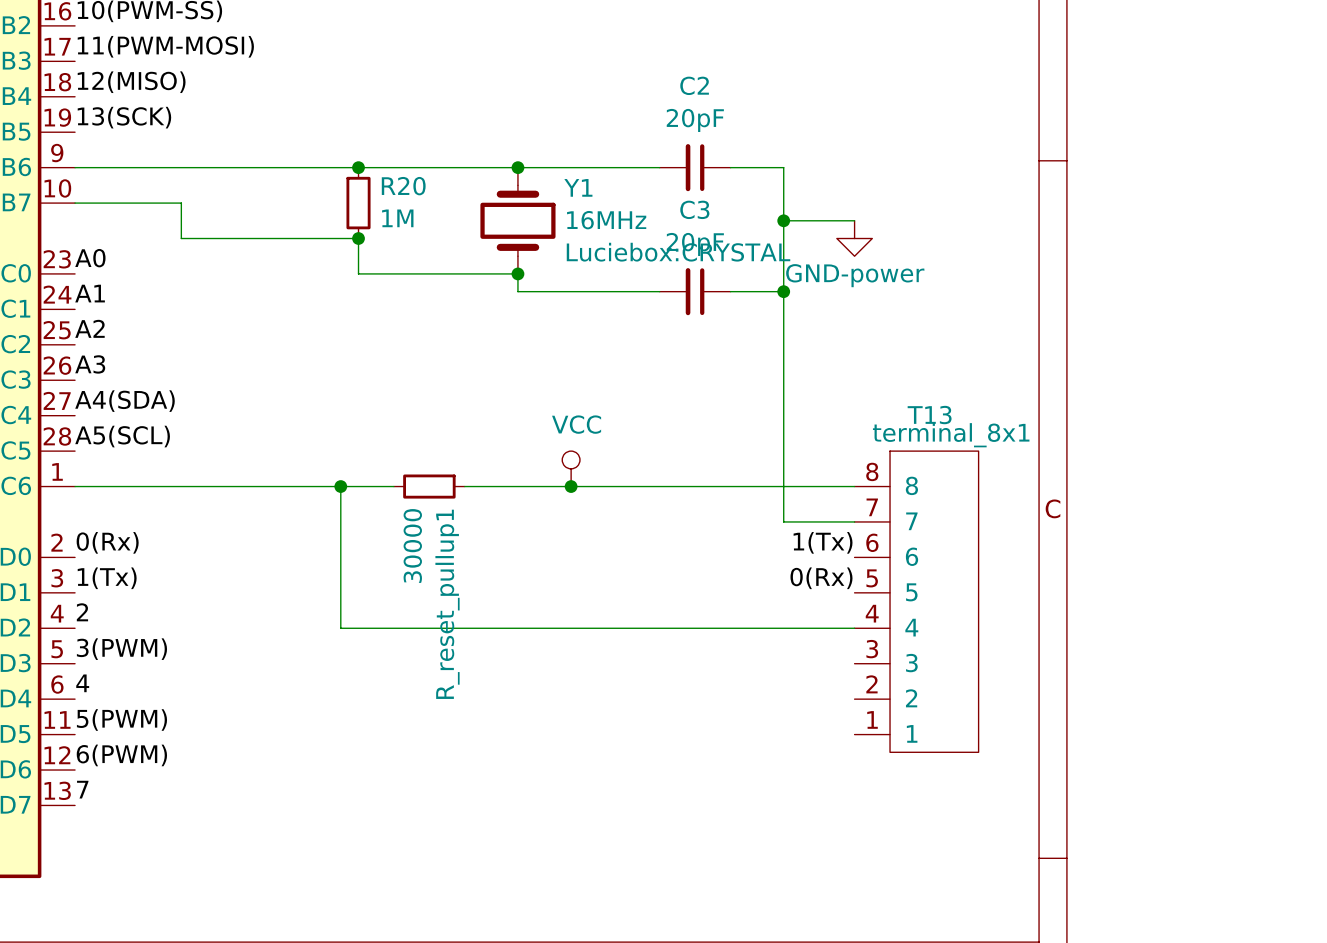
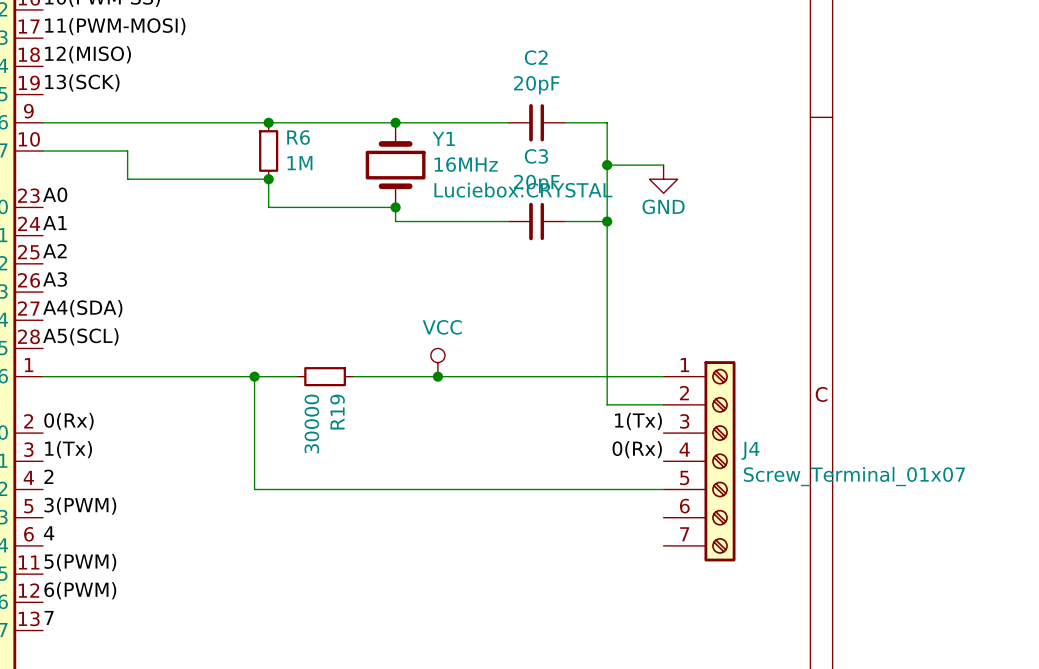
R20 name: R20 (403, 186) -> R6 (298, 137)
power symbol: GND-power (854, 238) -> GND (663, 179)
J4: none -> Screw_Terminal_01x07 (699, 461)
T13: terminal_8x1 (916, 601) -> none
R_reset_pullup1 name: R_reset_pullup1 (447, 604) -> R19 (337, 412)

